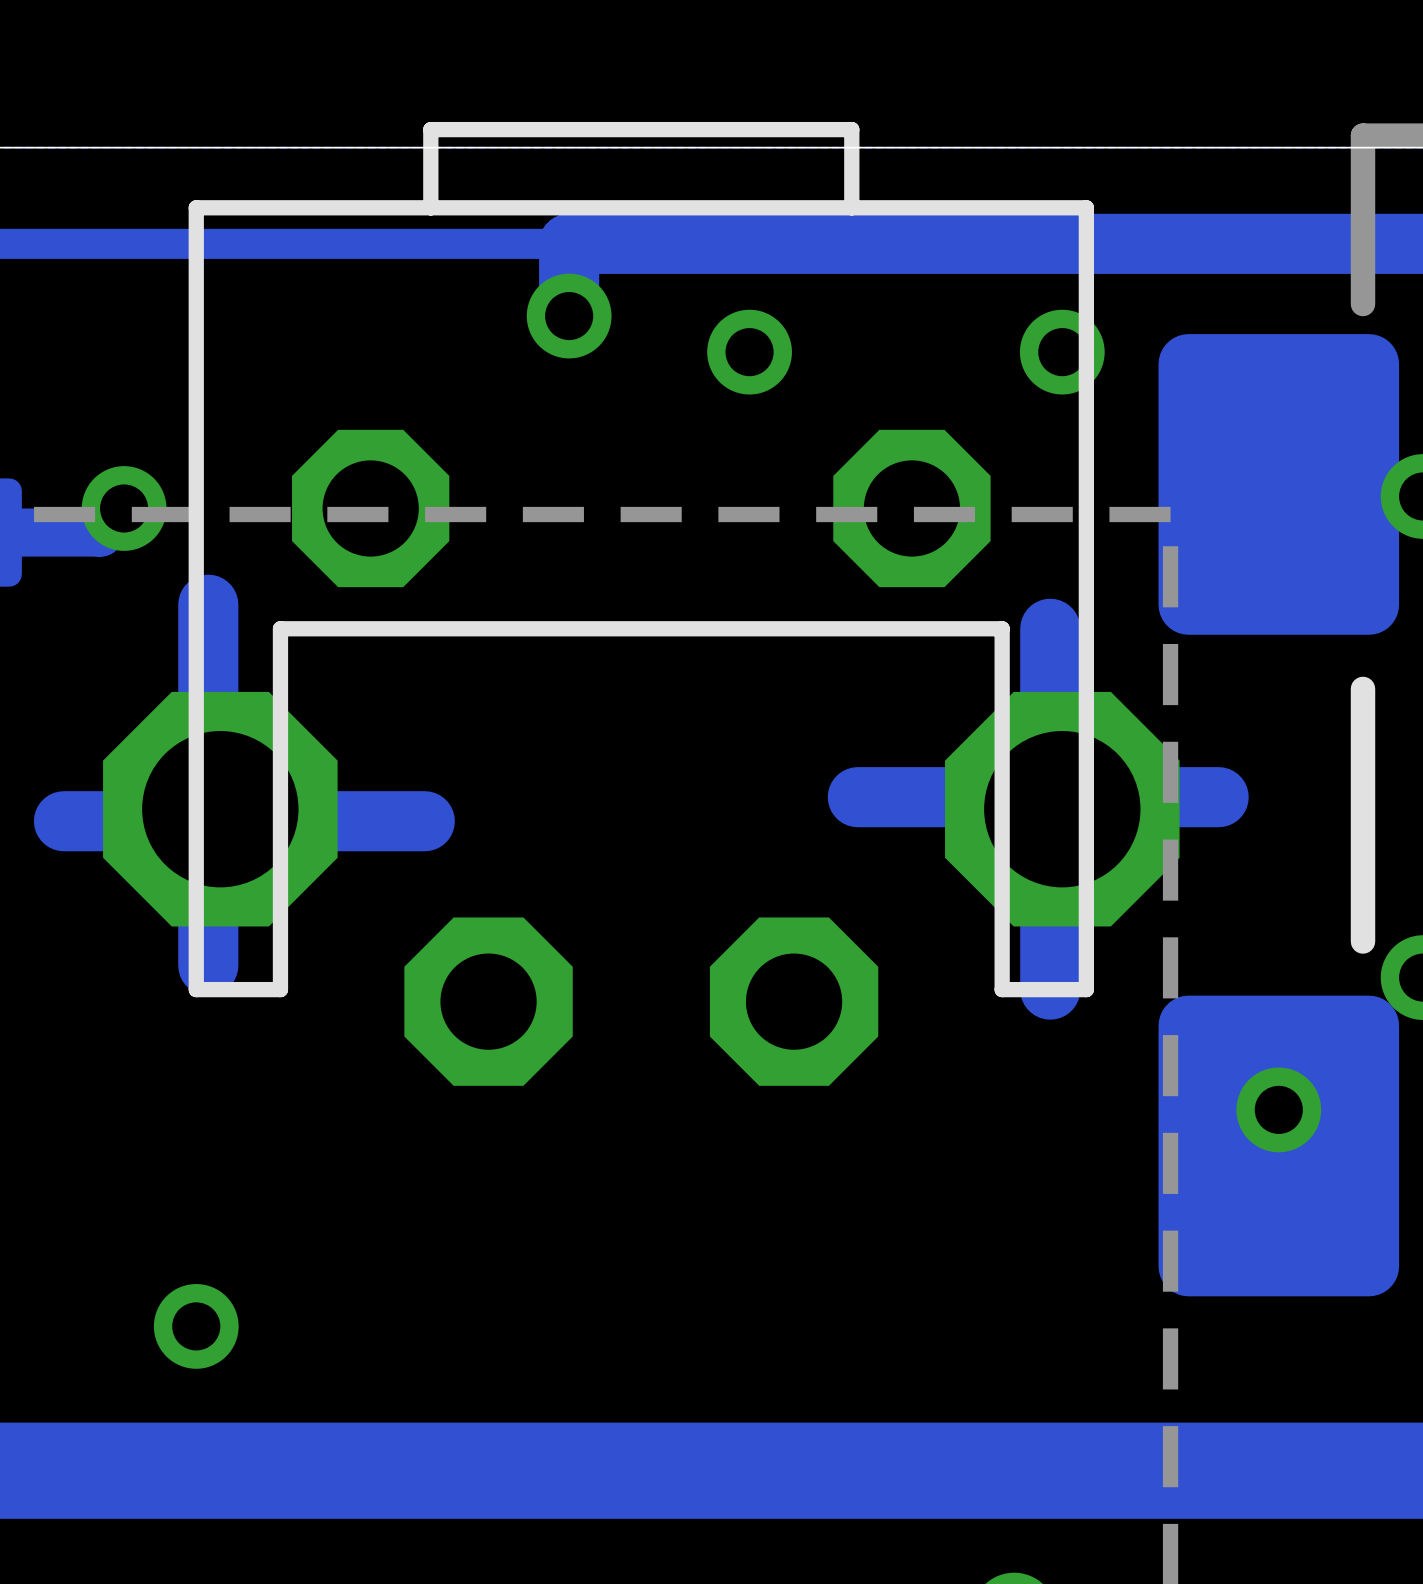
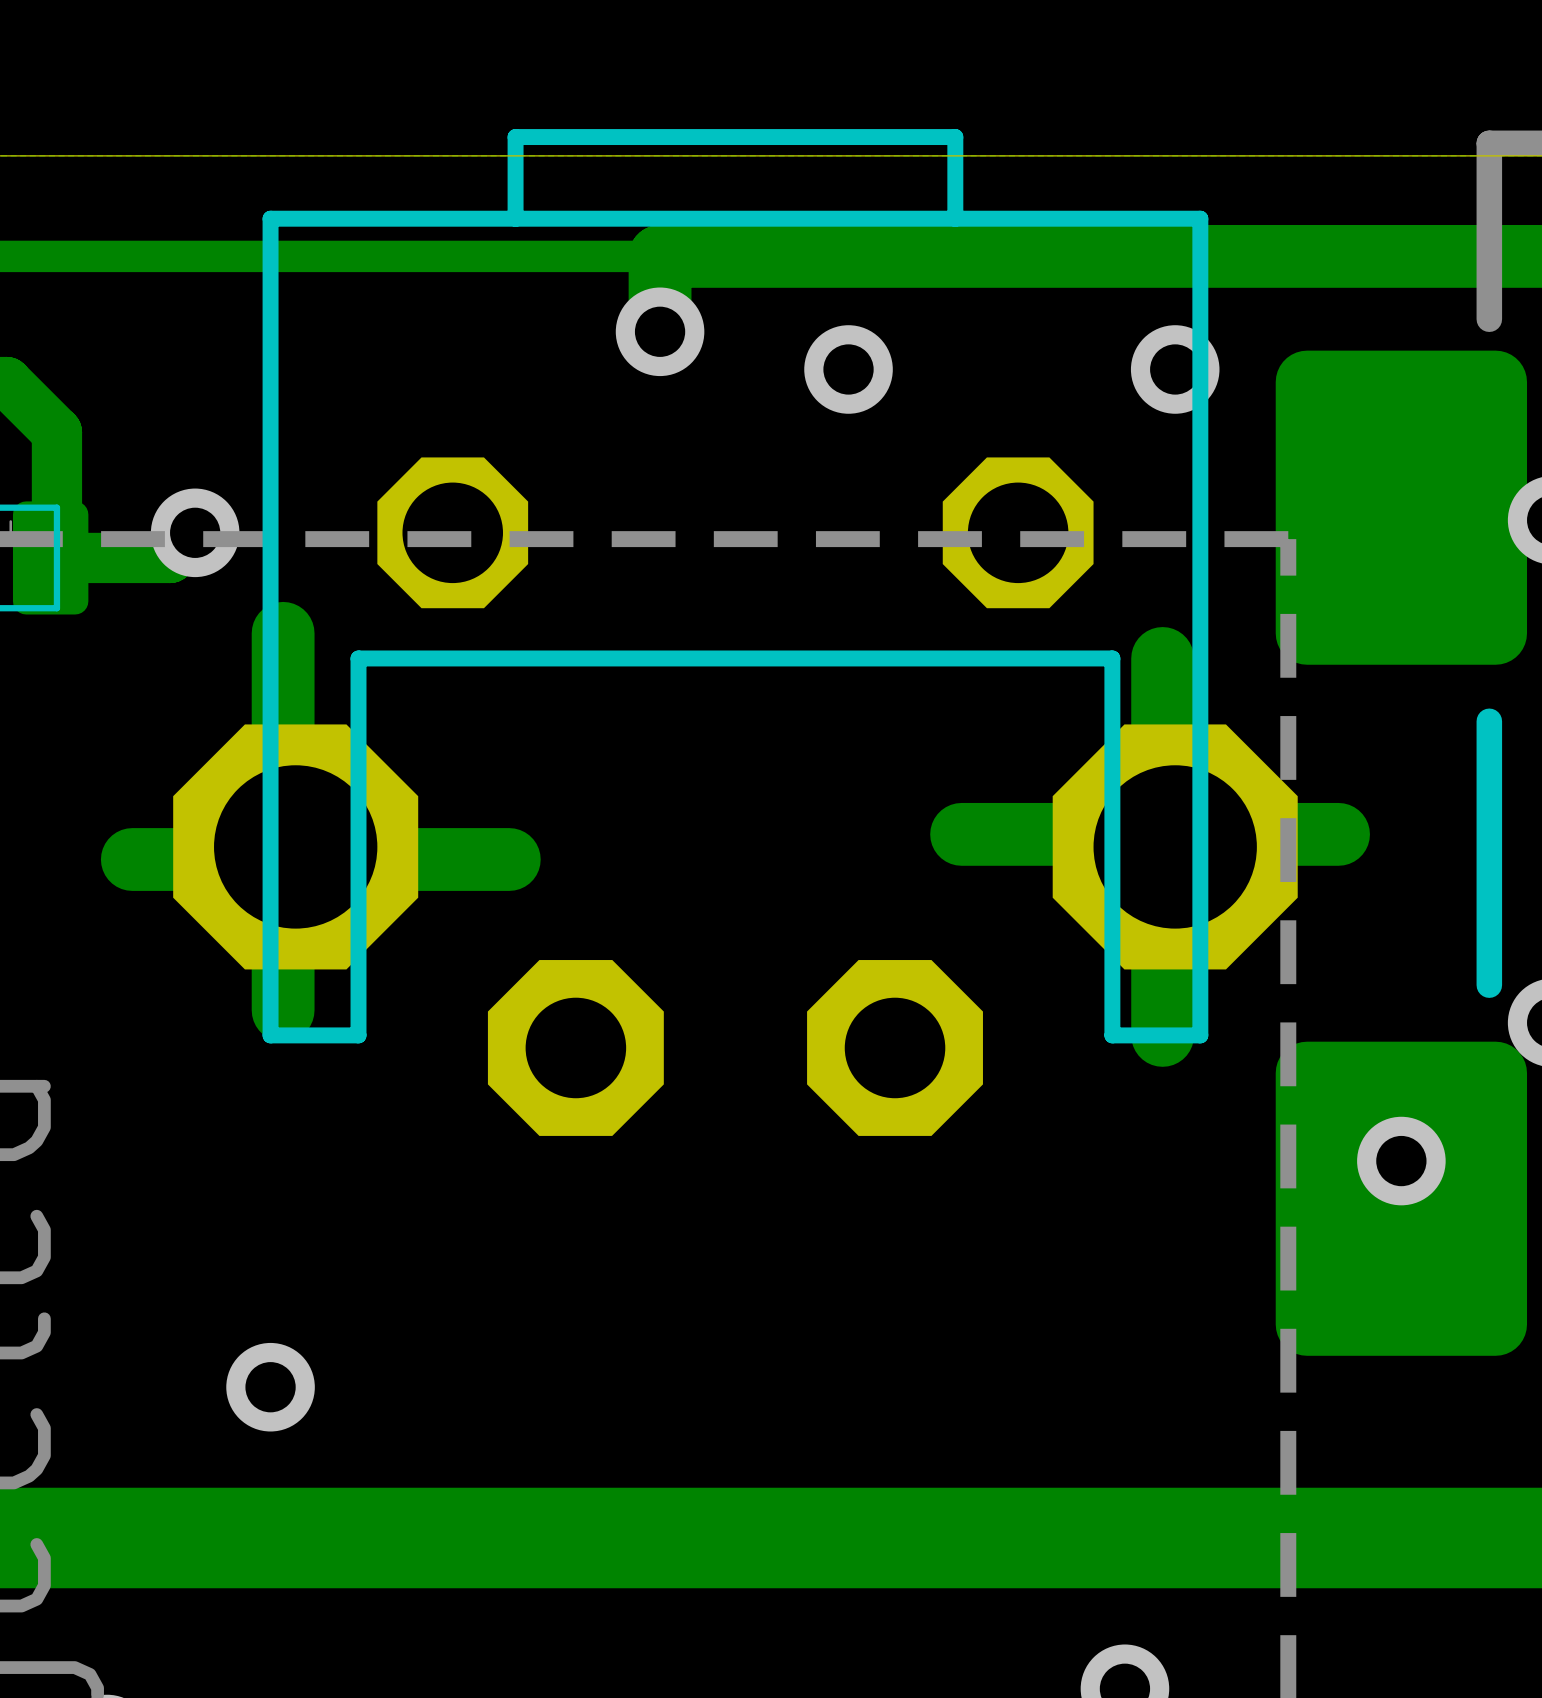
part footprint: [103, 121, 1180, 998] -> [173, 129, 1298, 1044]

